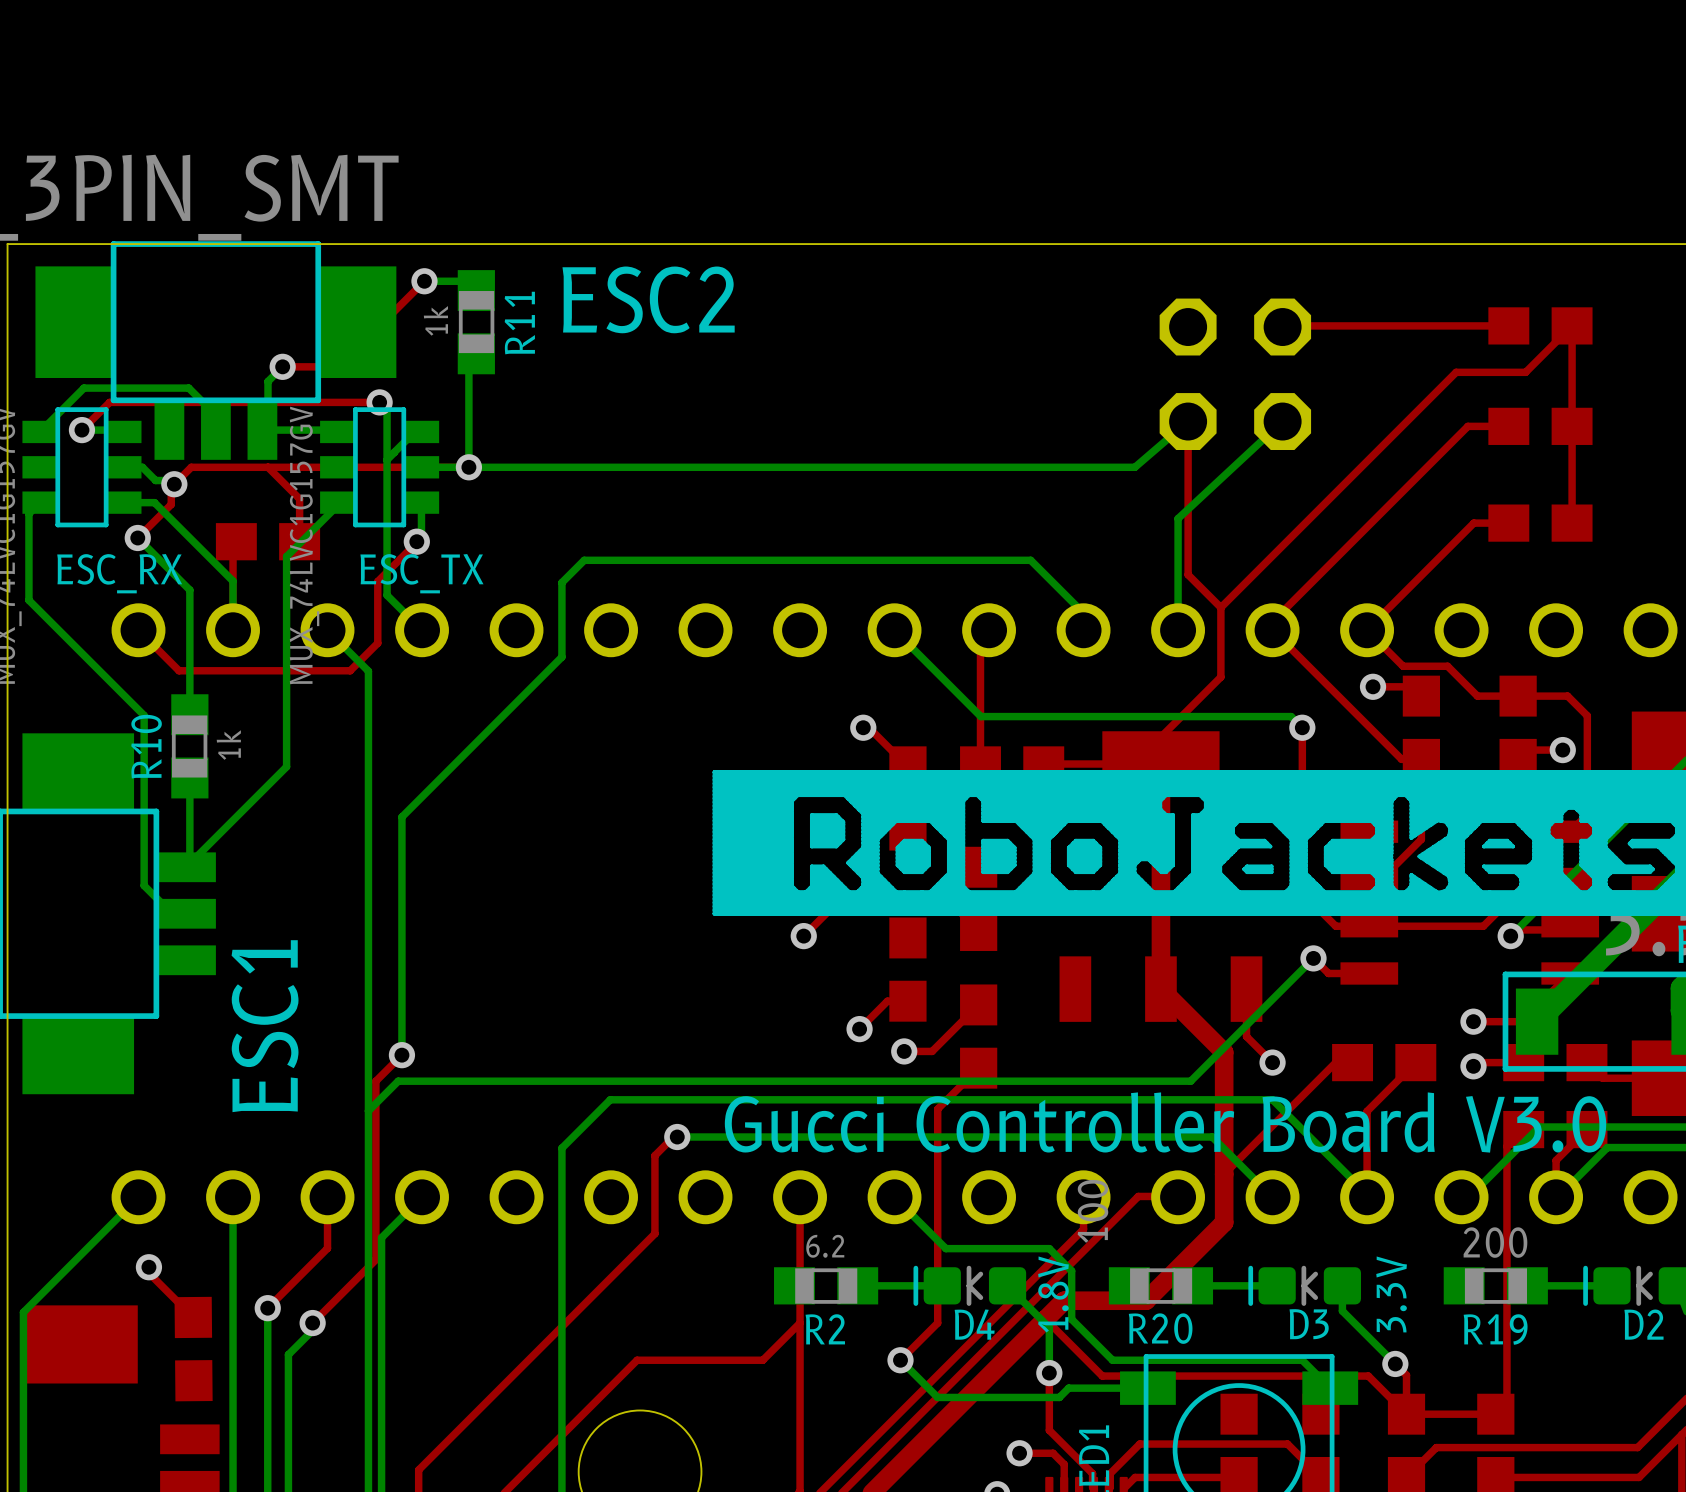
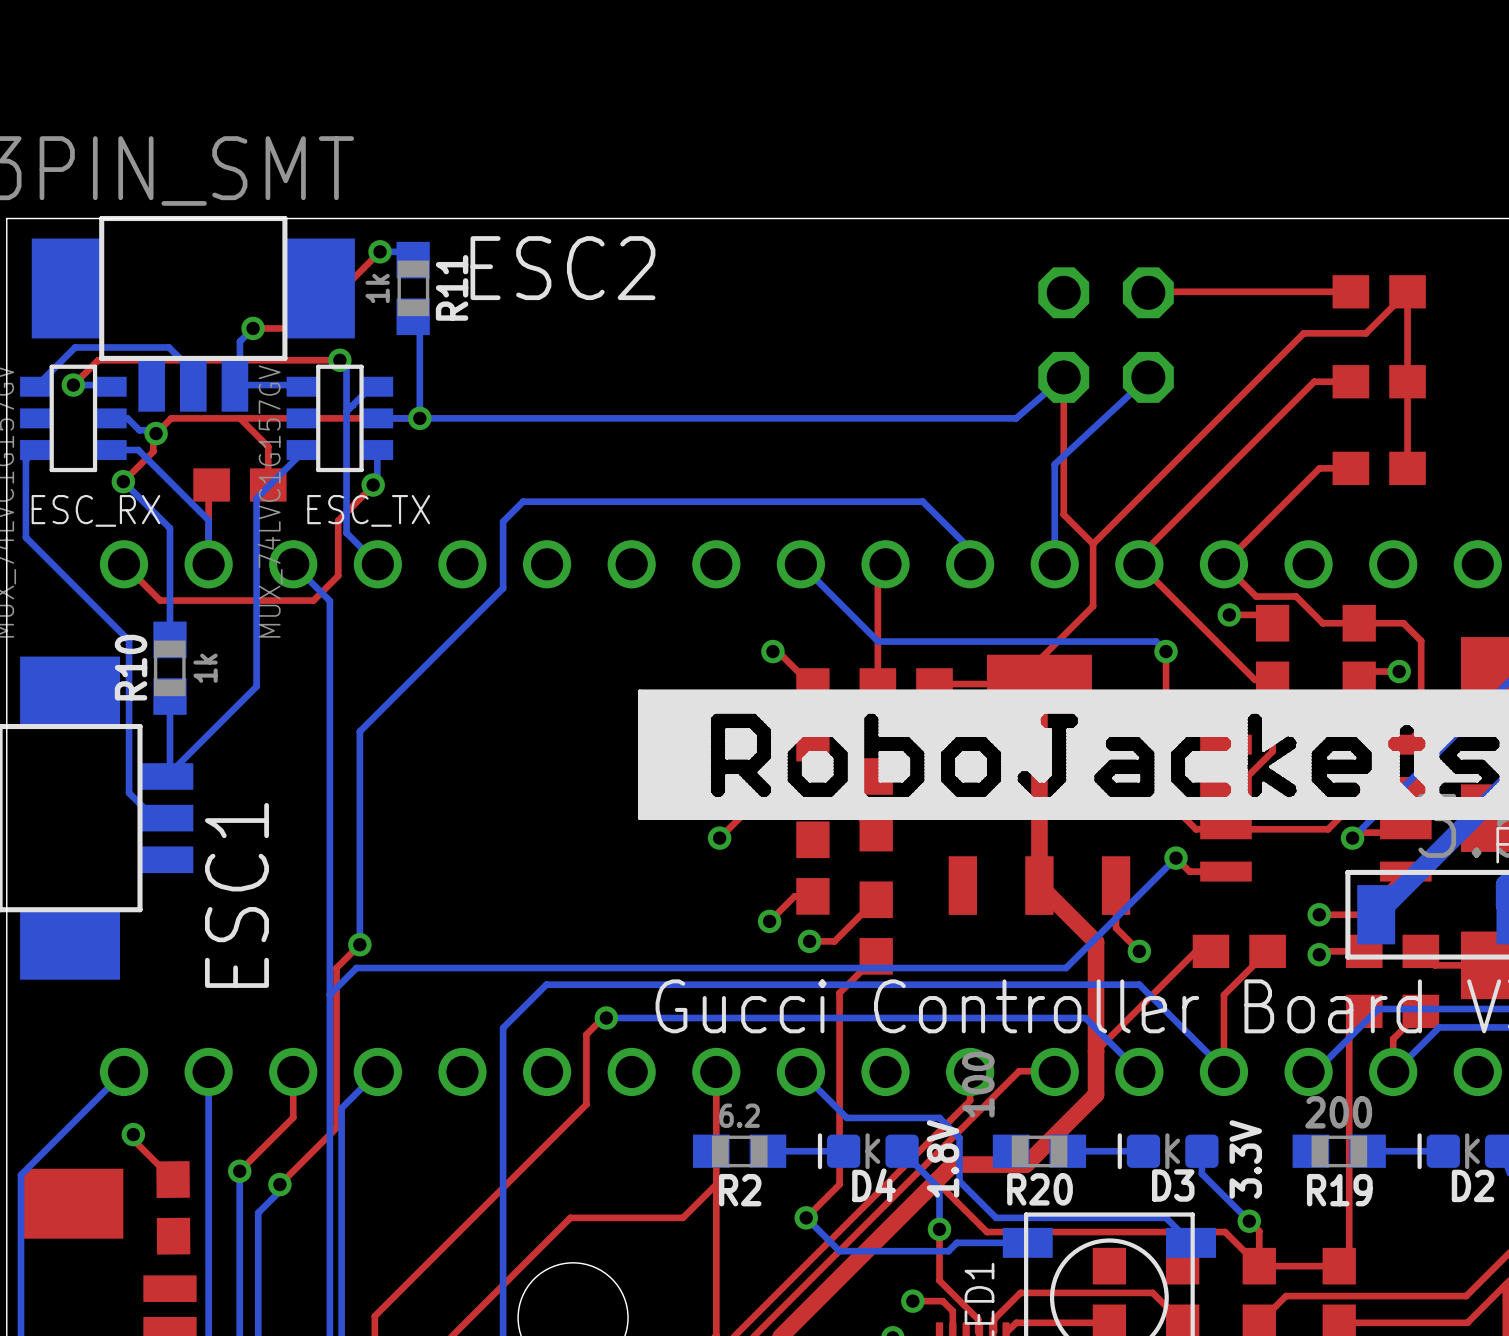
R11 position: (476, 322) -> (413, 288)

